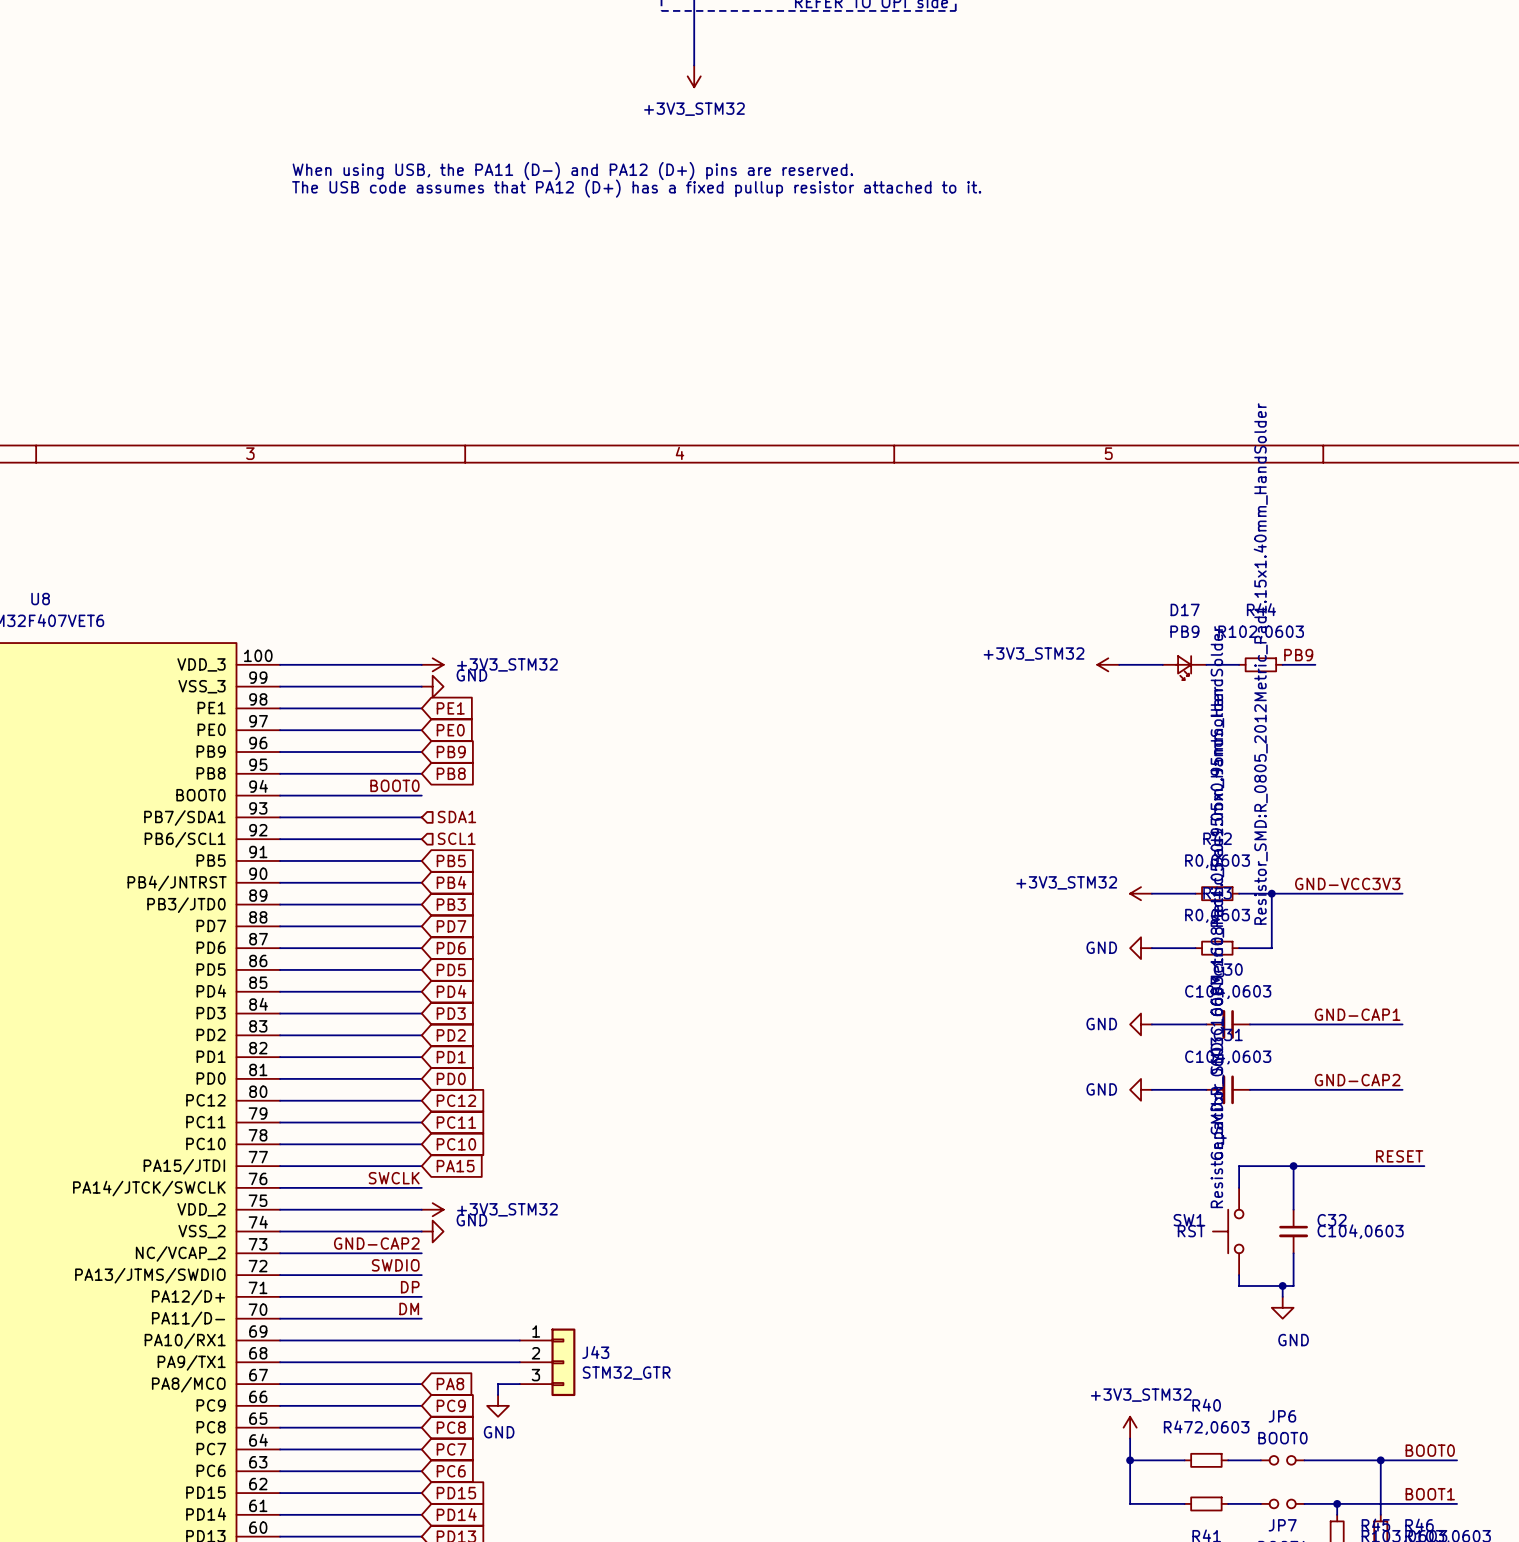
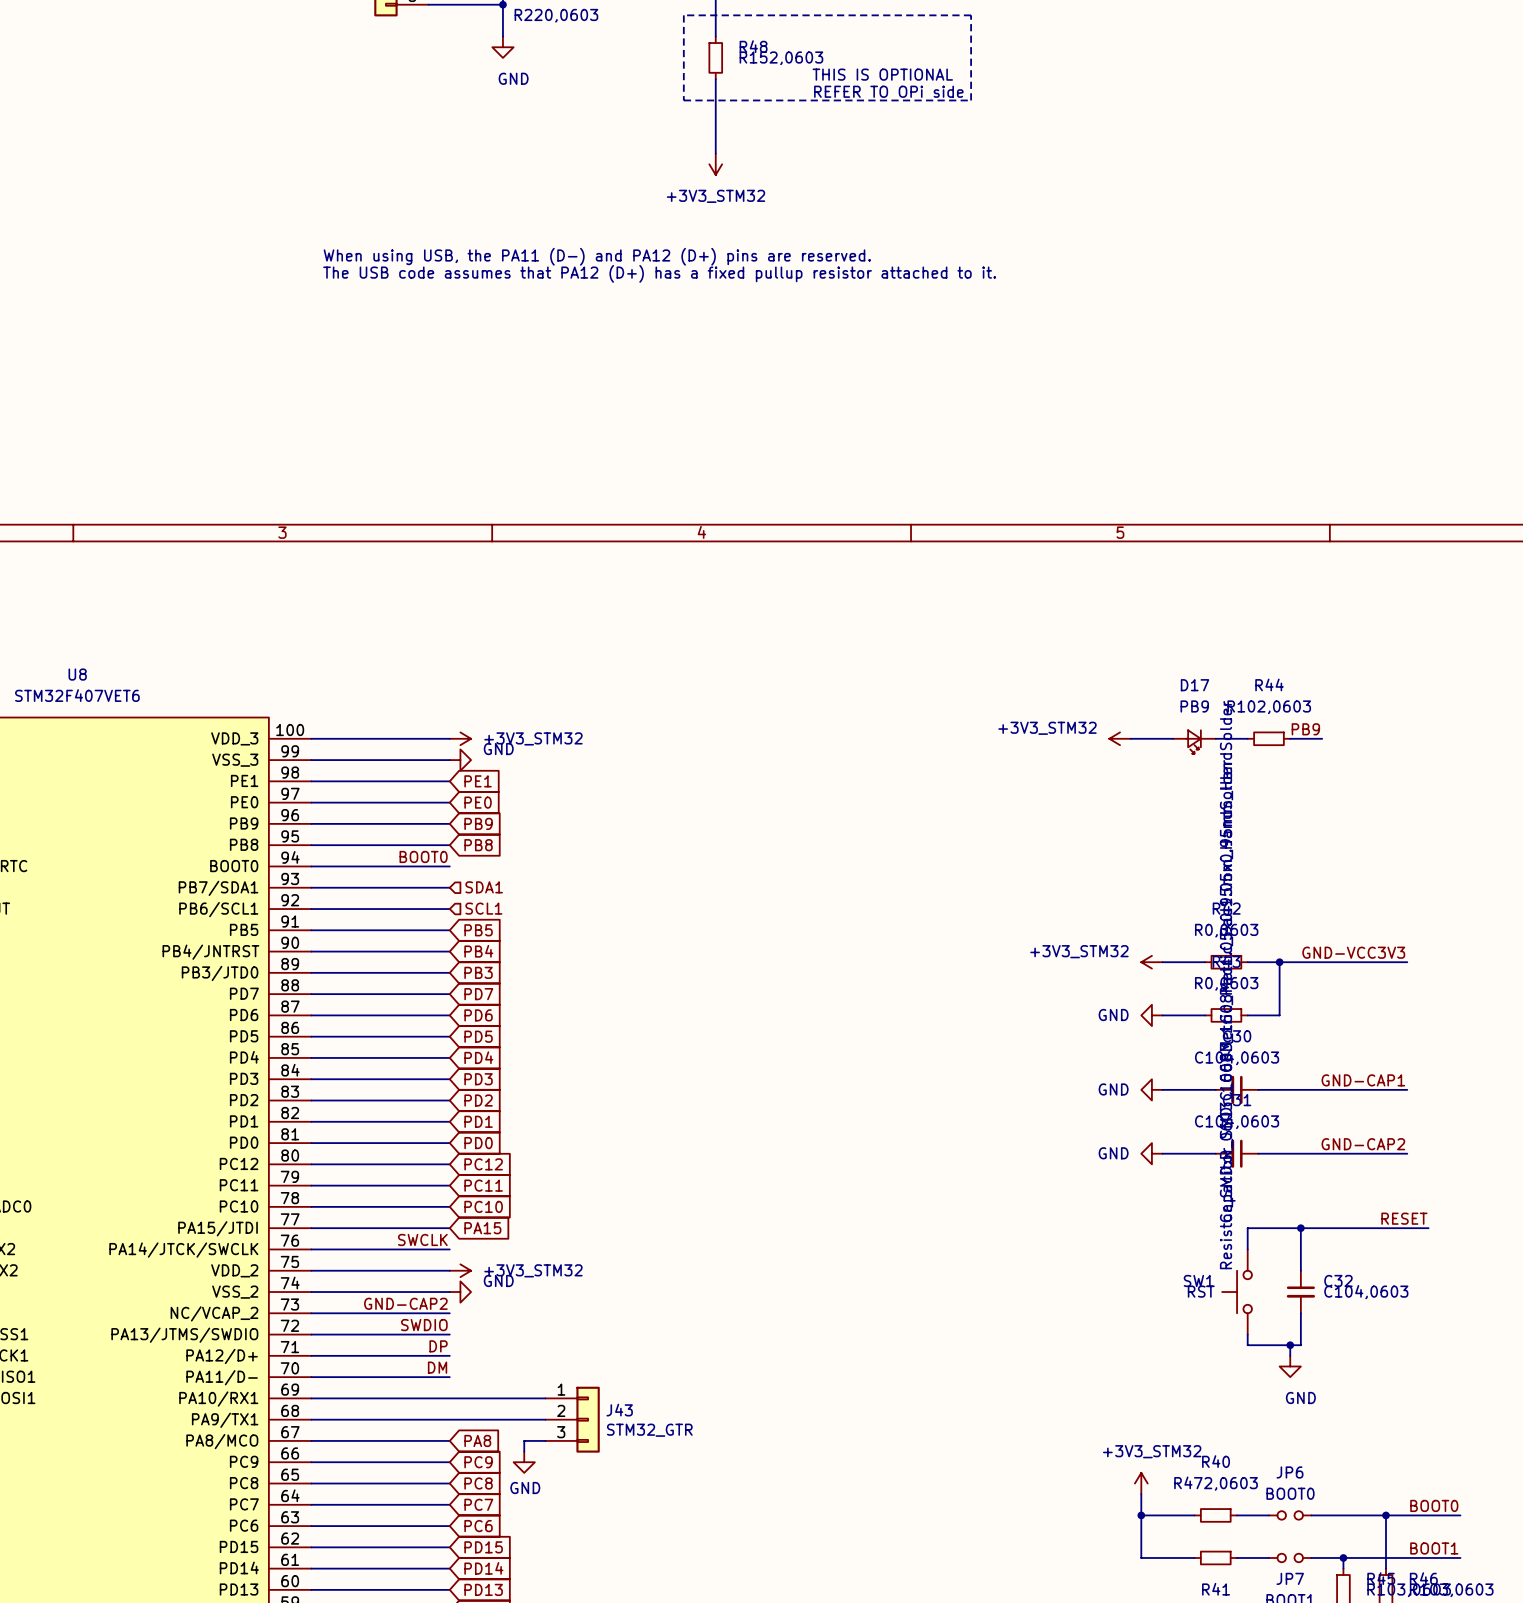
R44 text: Resistor_SMD:R_0805_2012Metric_Pad1.15x1.40mm_HandSolder (1260, 664) -> none

